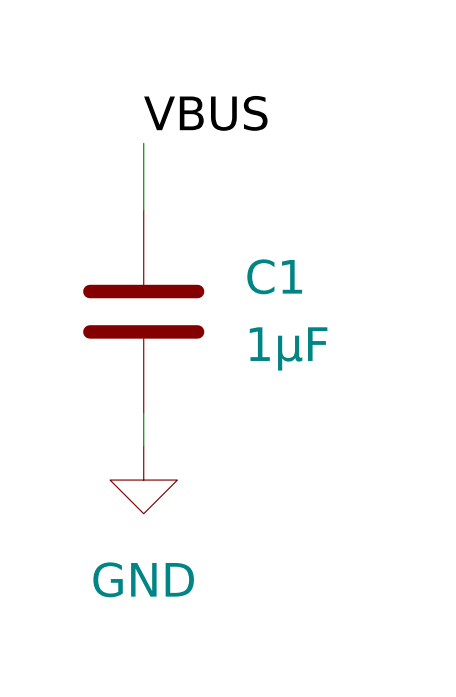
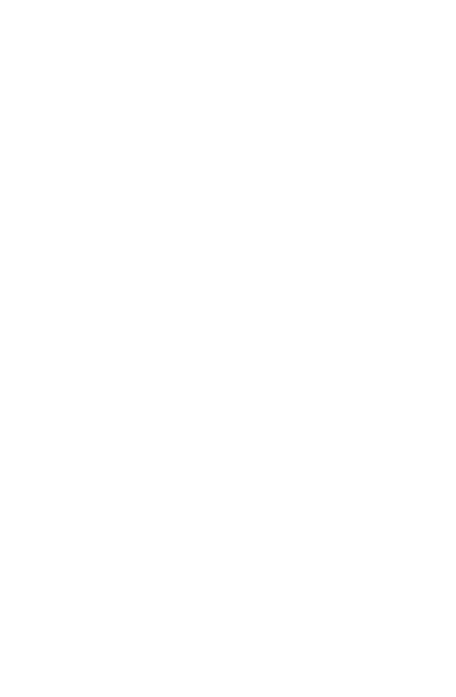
label: VBUS (205, 113) -> none
wire: (143, 143) (143, 210) -> none
C1: 1µF (143, 311) -> none
wire: (143, 412) (143, 446) -> none
power symbol: GND (143, 480) -> none

